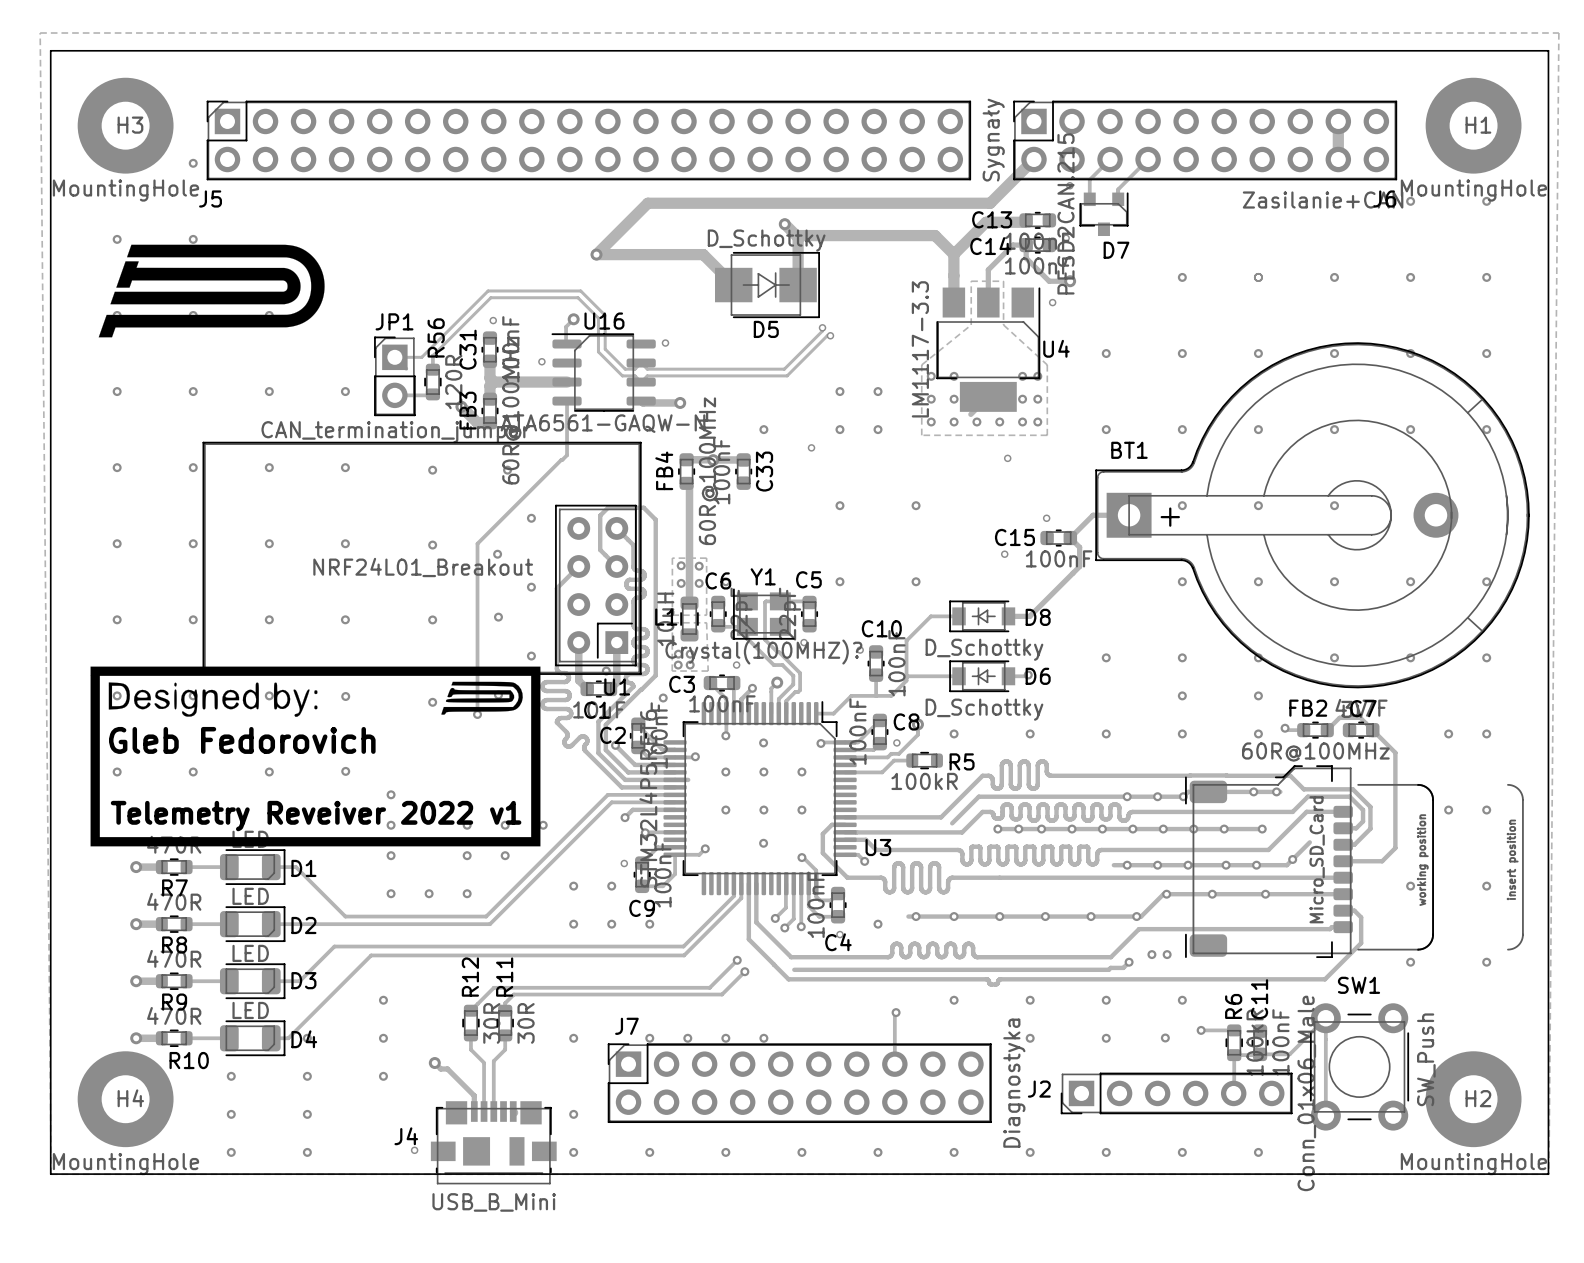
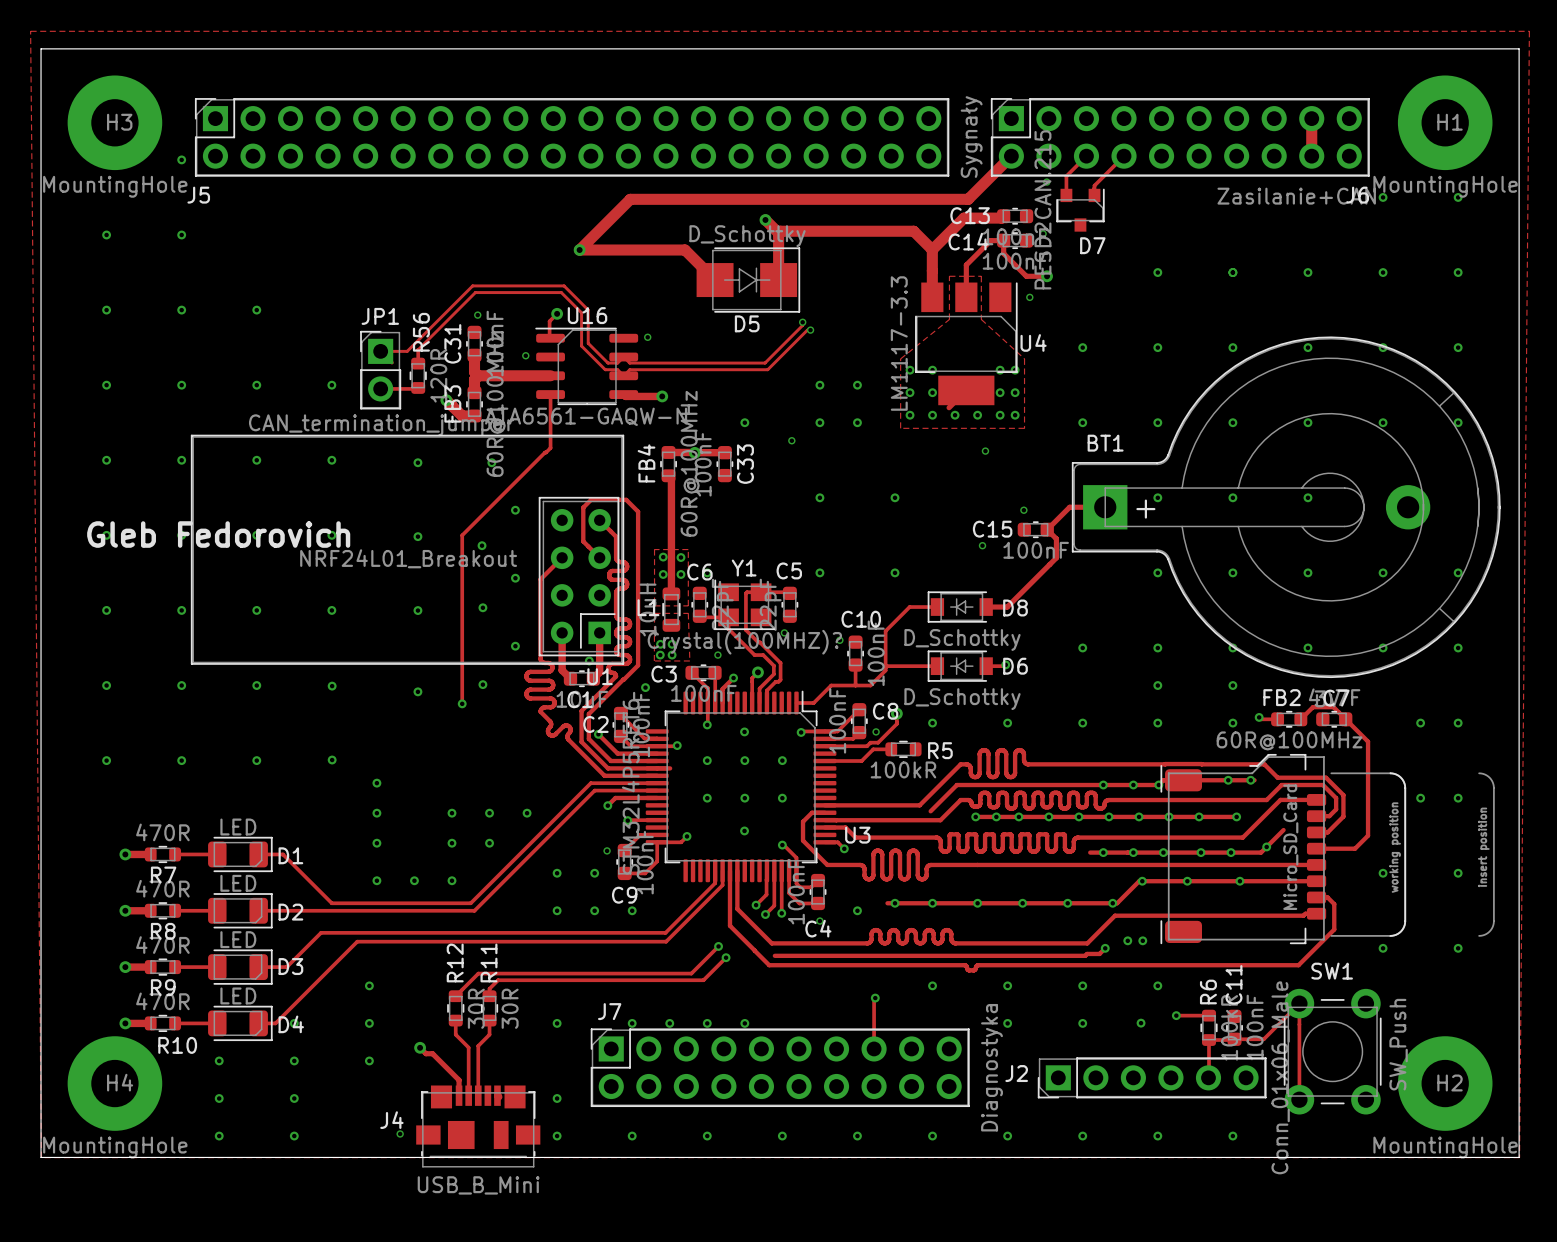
drawing: [98, 244, 325, 338] -> none
drawing: [90, 666, 541, 847] -> none
text position: Gleb Fedorovich (242, 740) -> Gleb Fedorovich (218, 534)
text: Telemetry Reveiver 2022 v1 (316, 816) -> none

